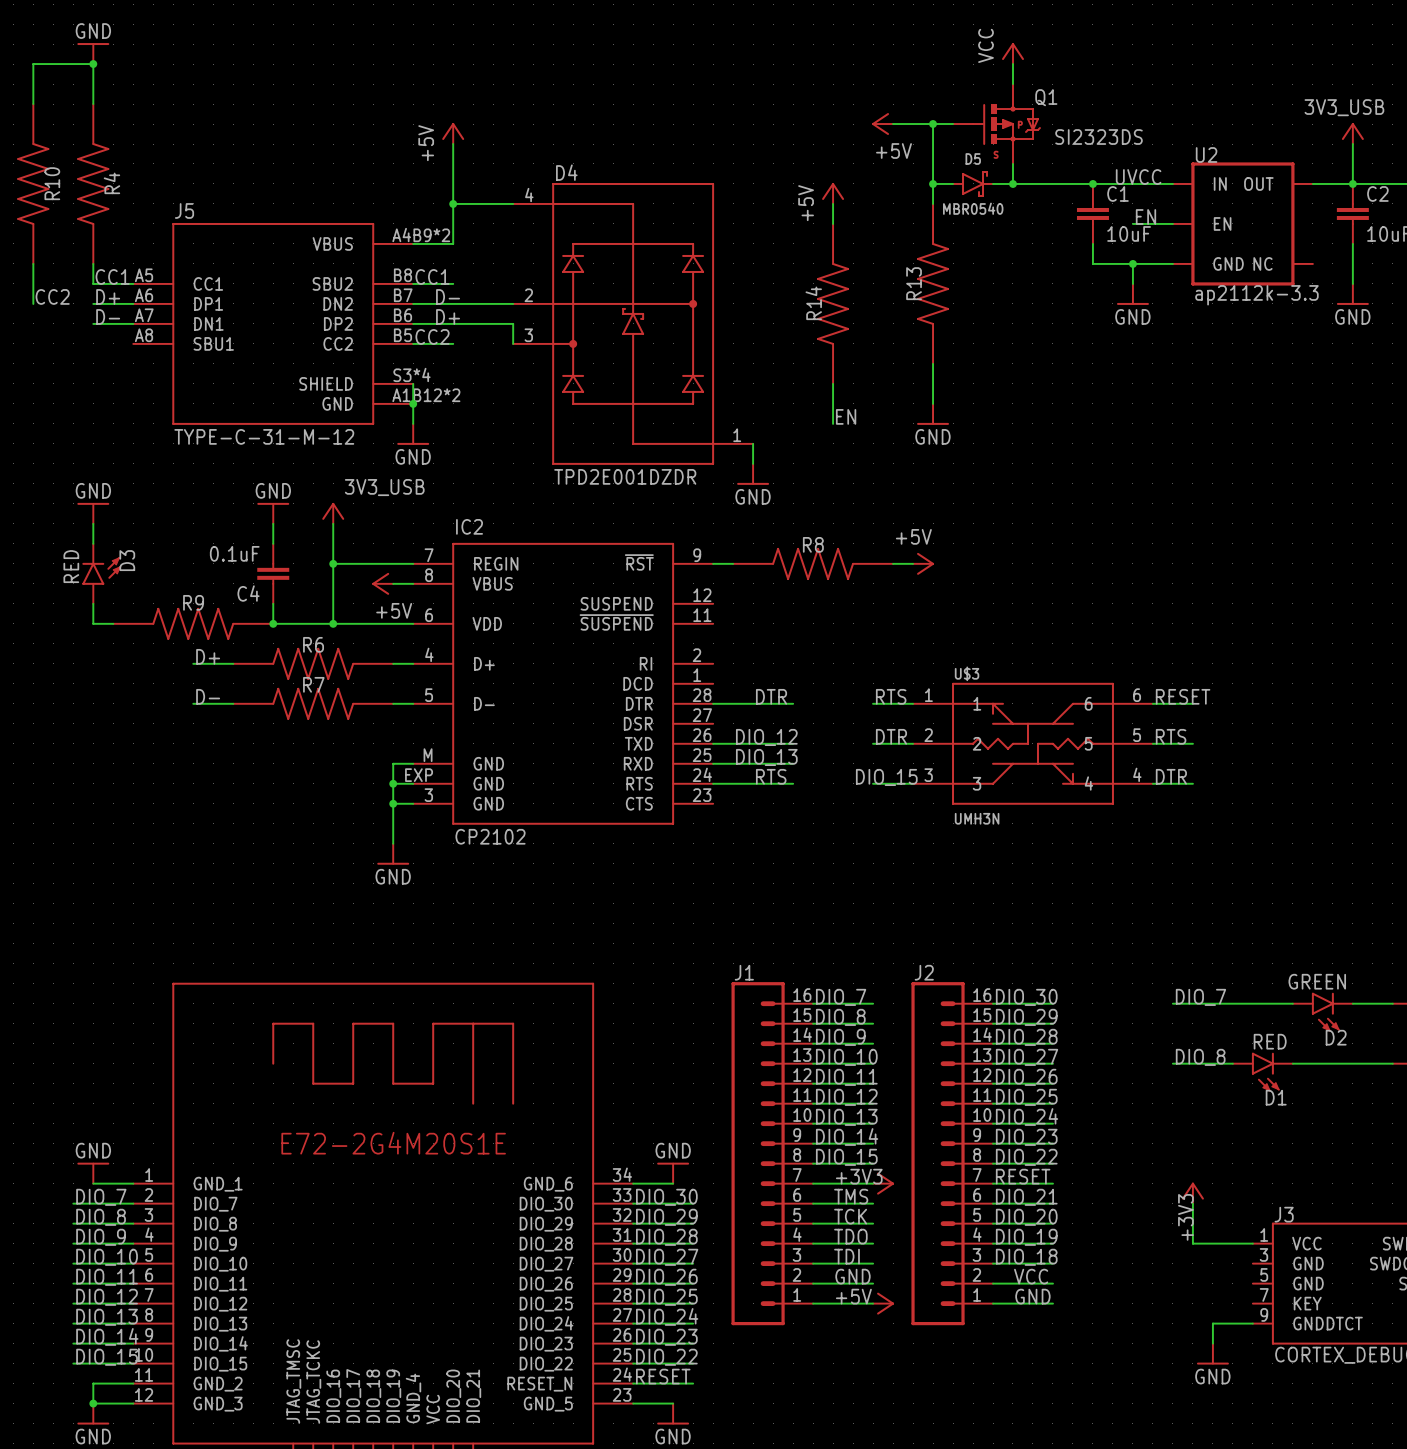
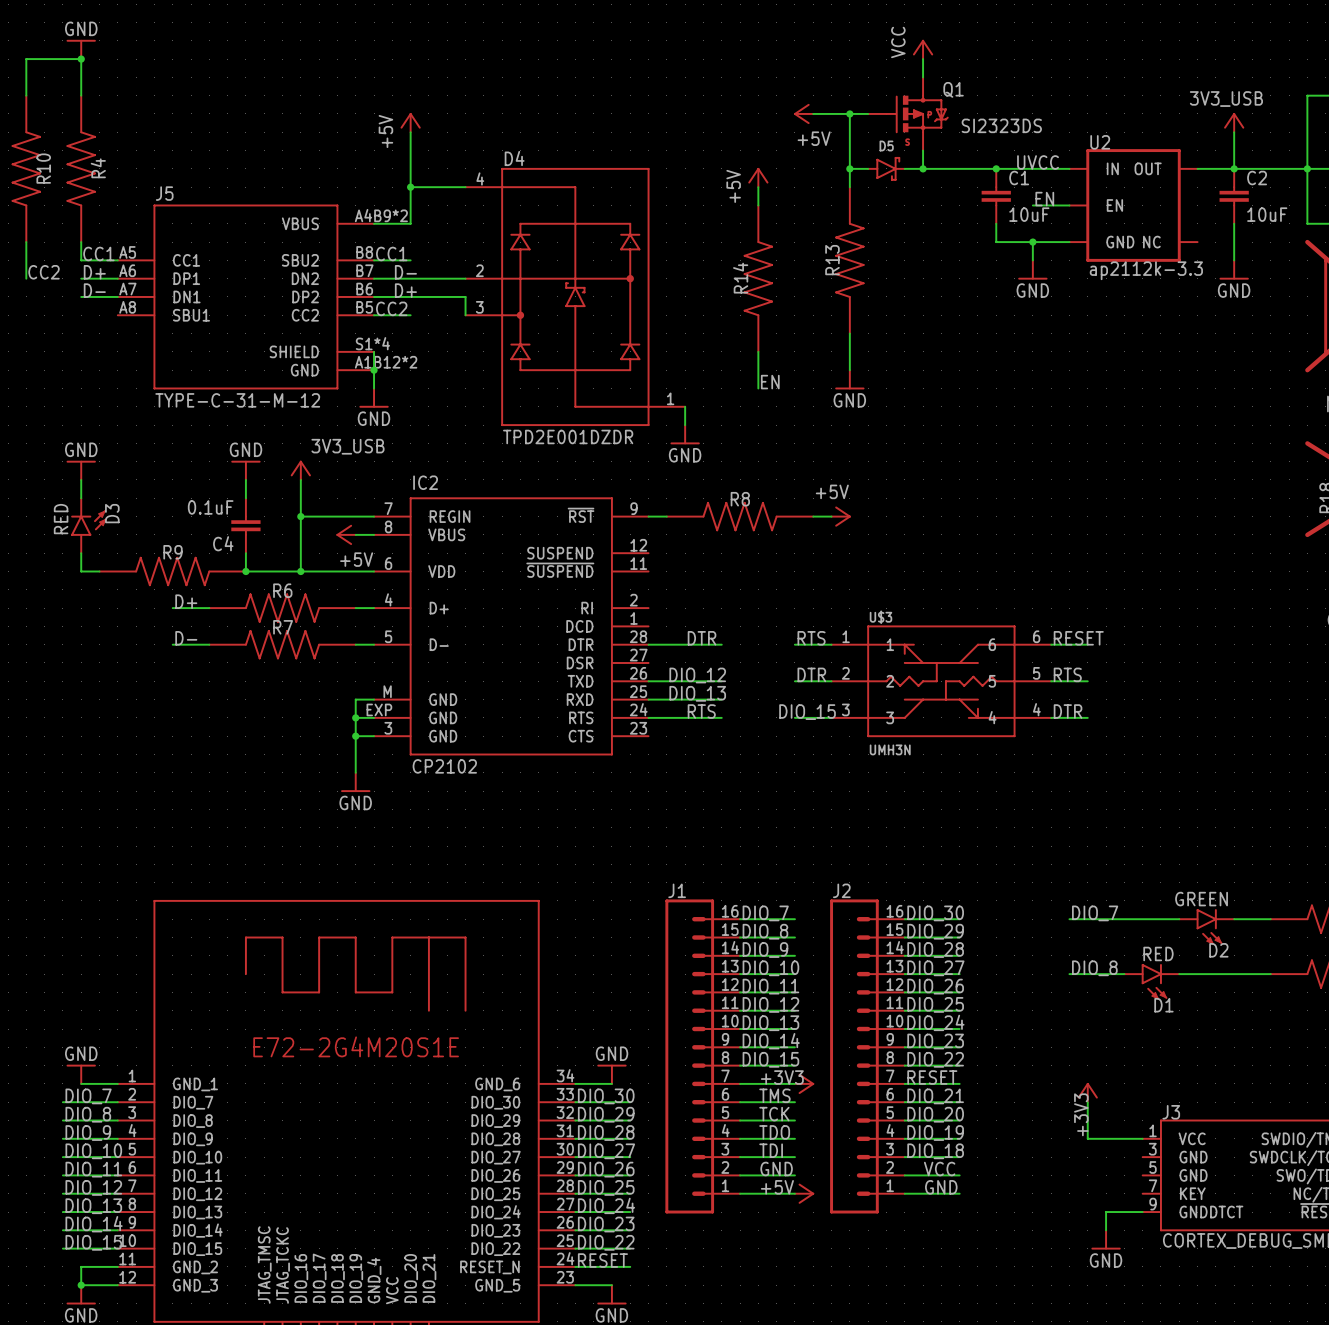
D5 value: MBR0540 (973, 208) -> none
J5 pin number: S3*4 (411, 374) -> S1*4 (372, 343)

